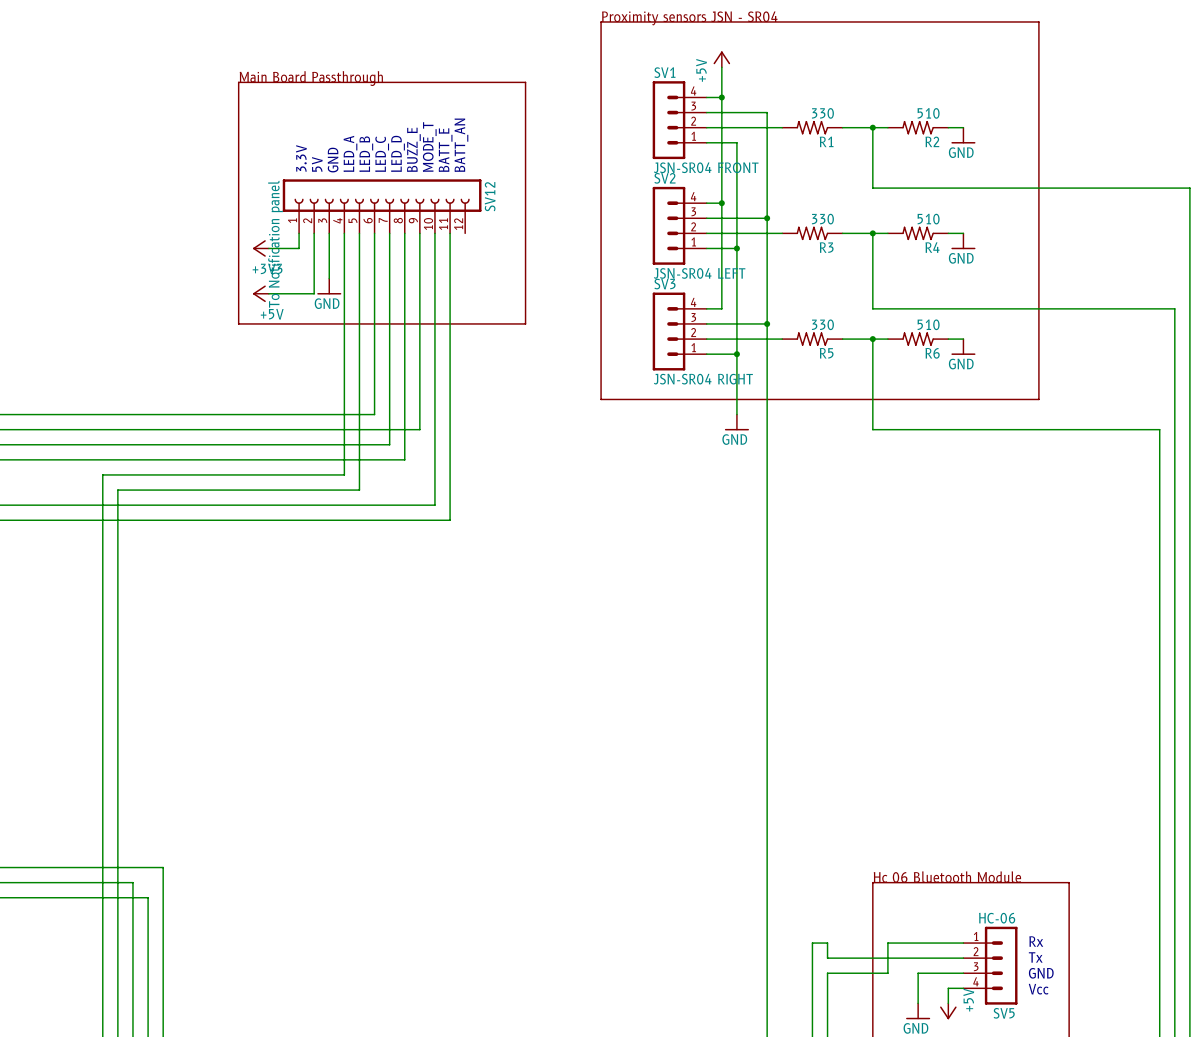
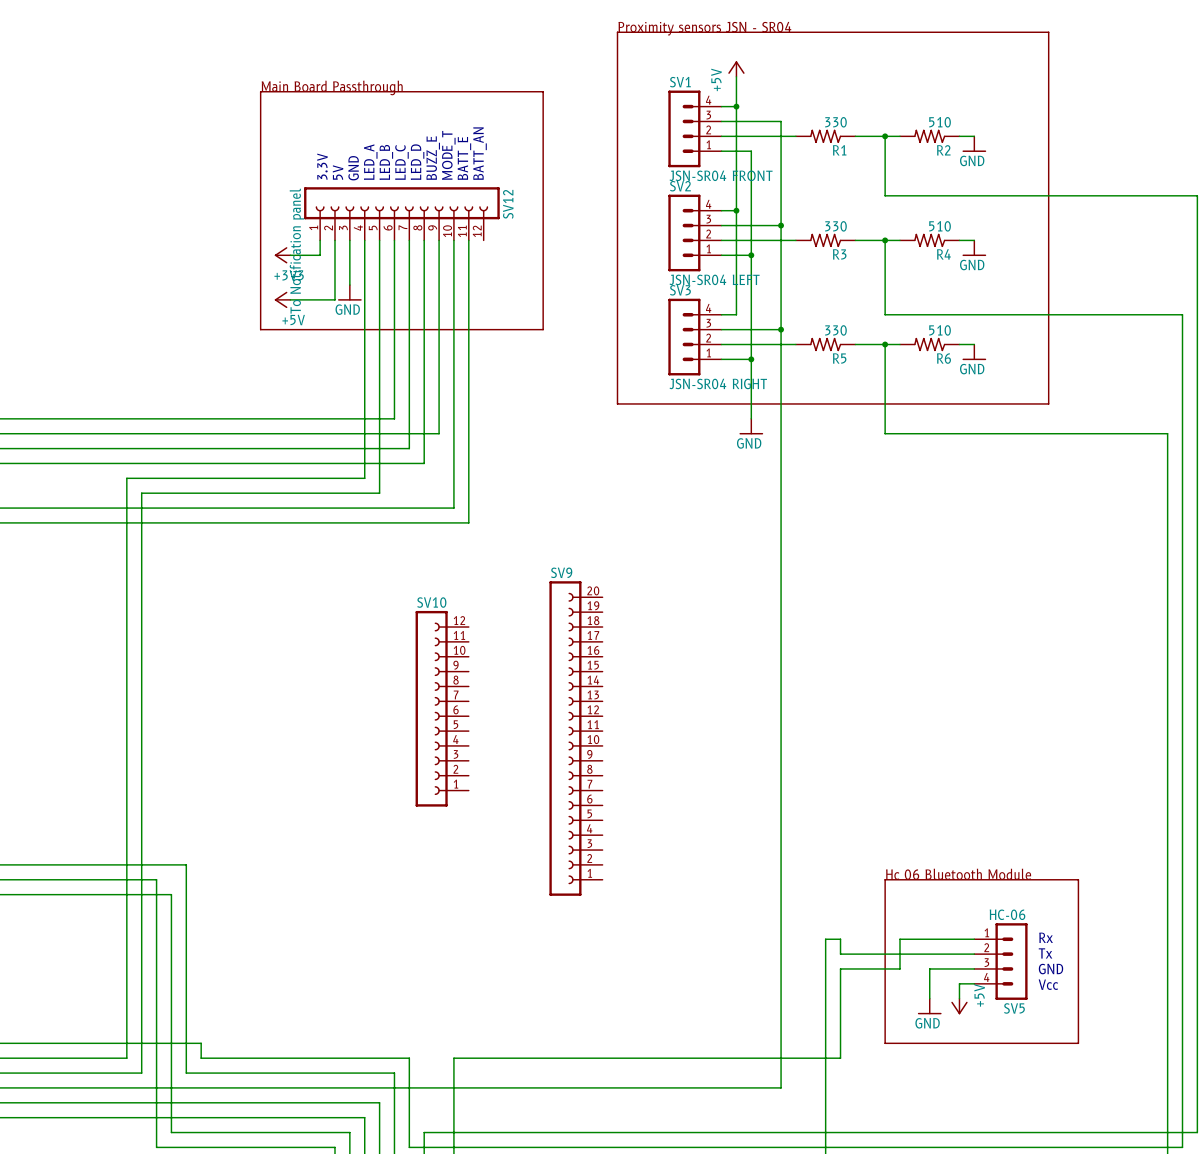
SV10: none -> (442, 708)
SV9: none -> (576, 738)

